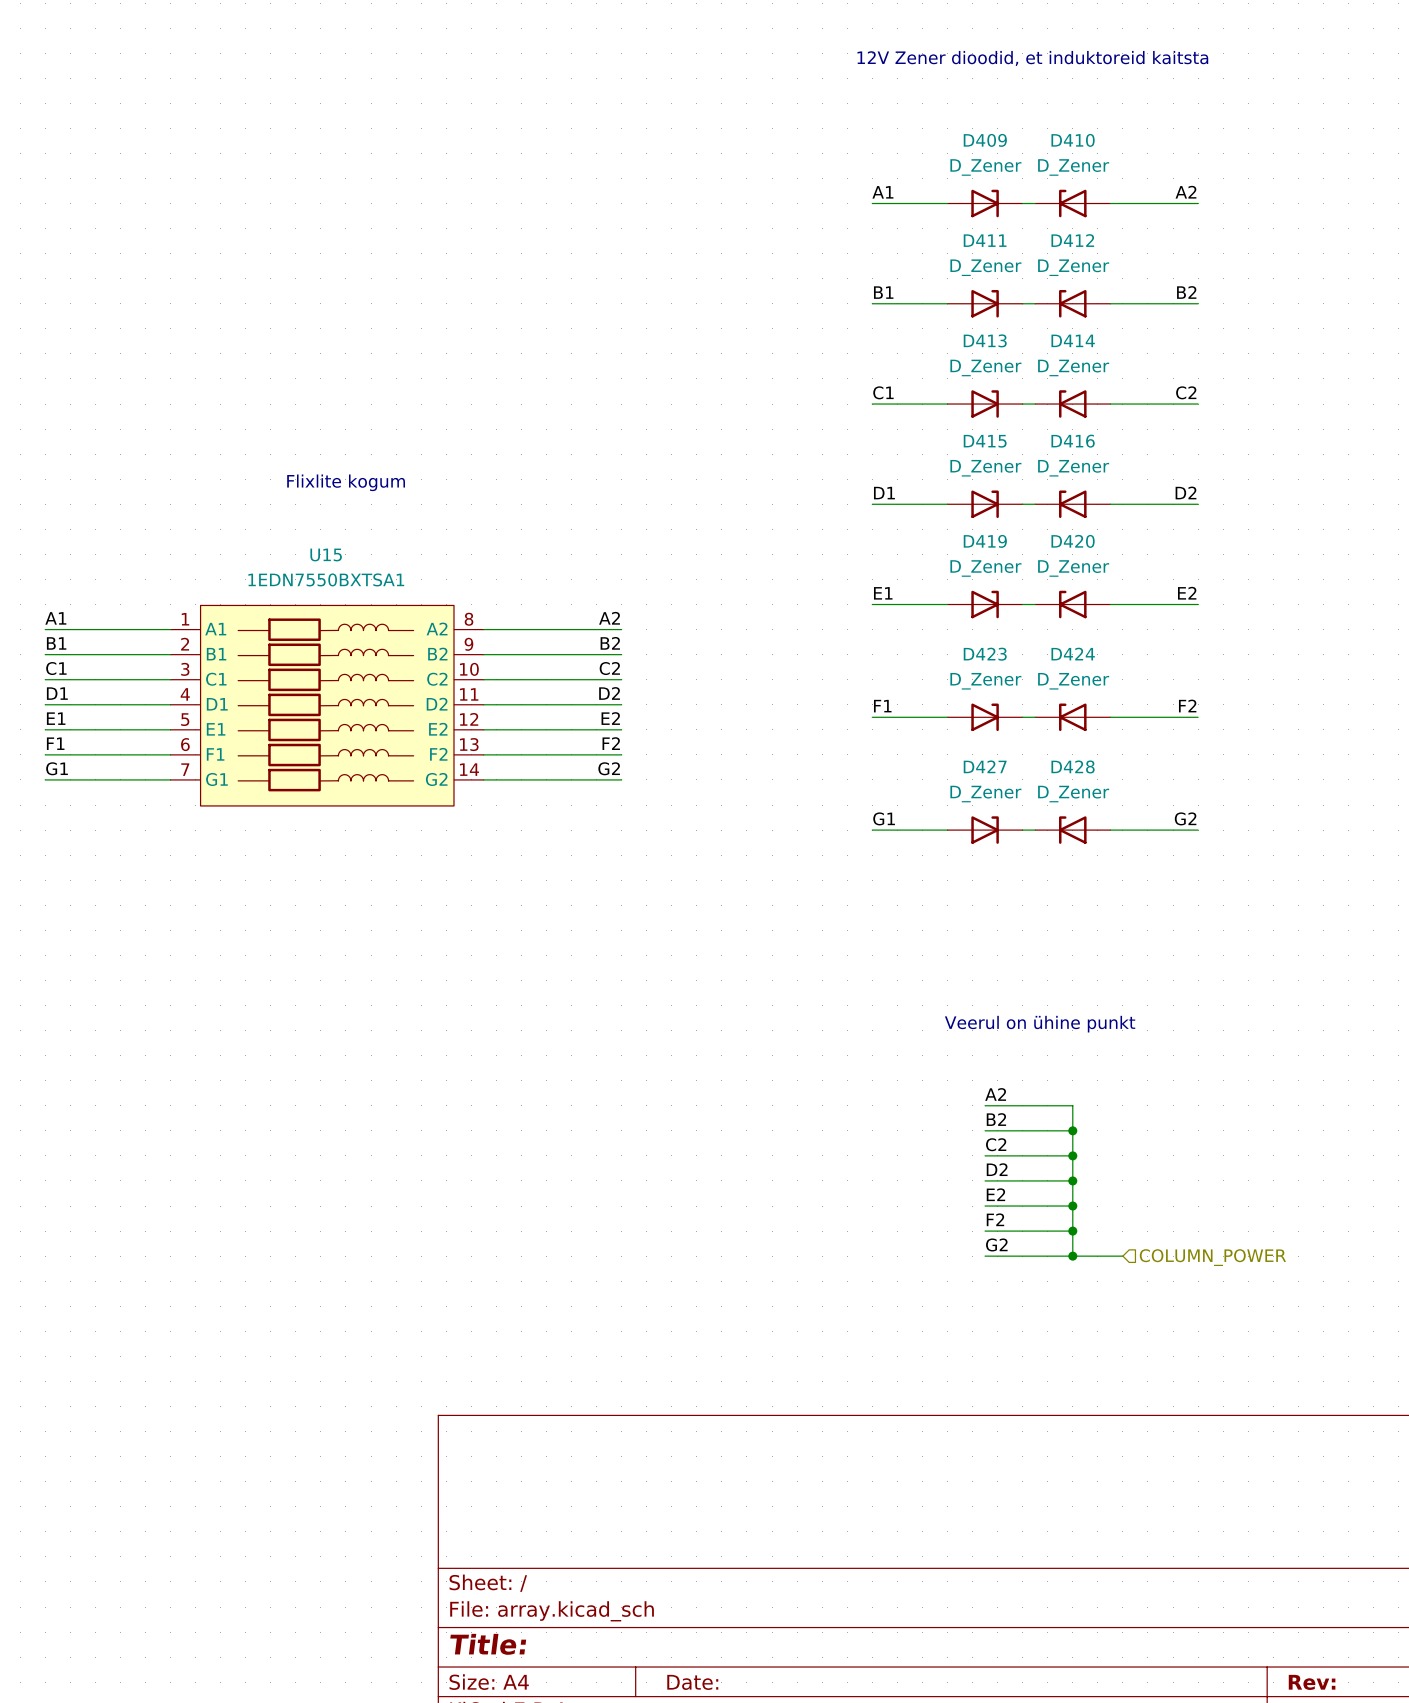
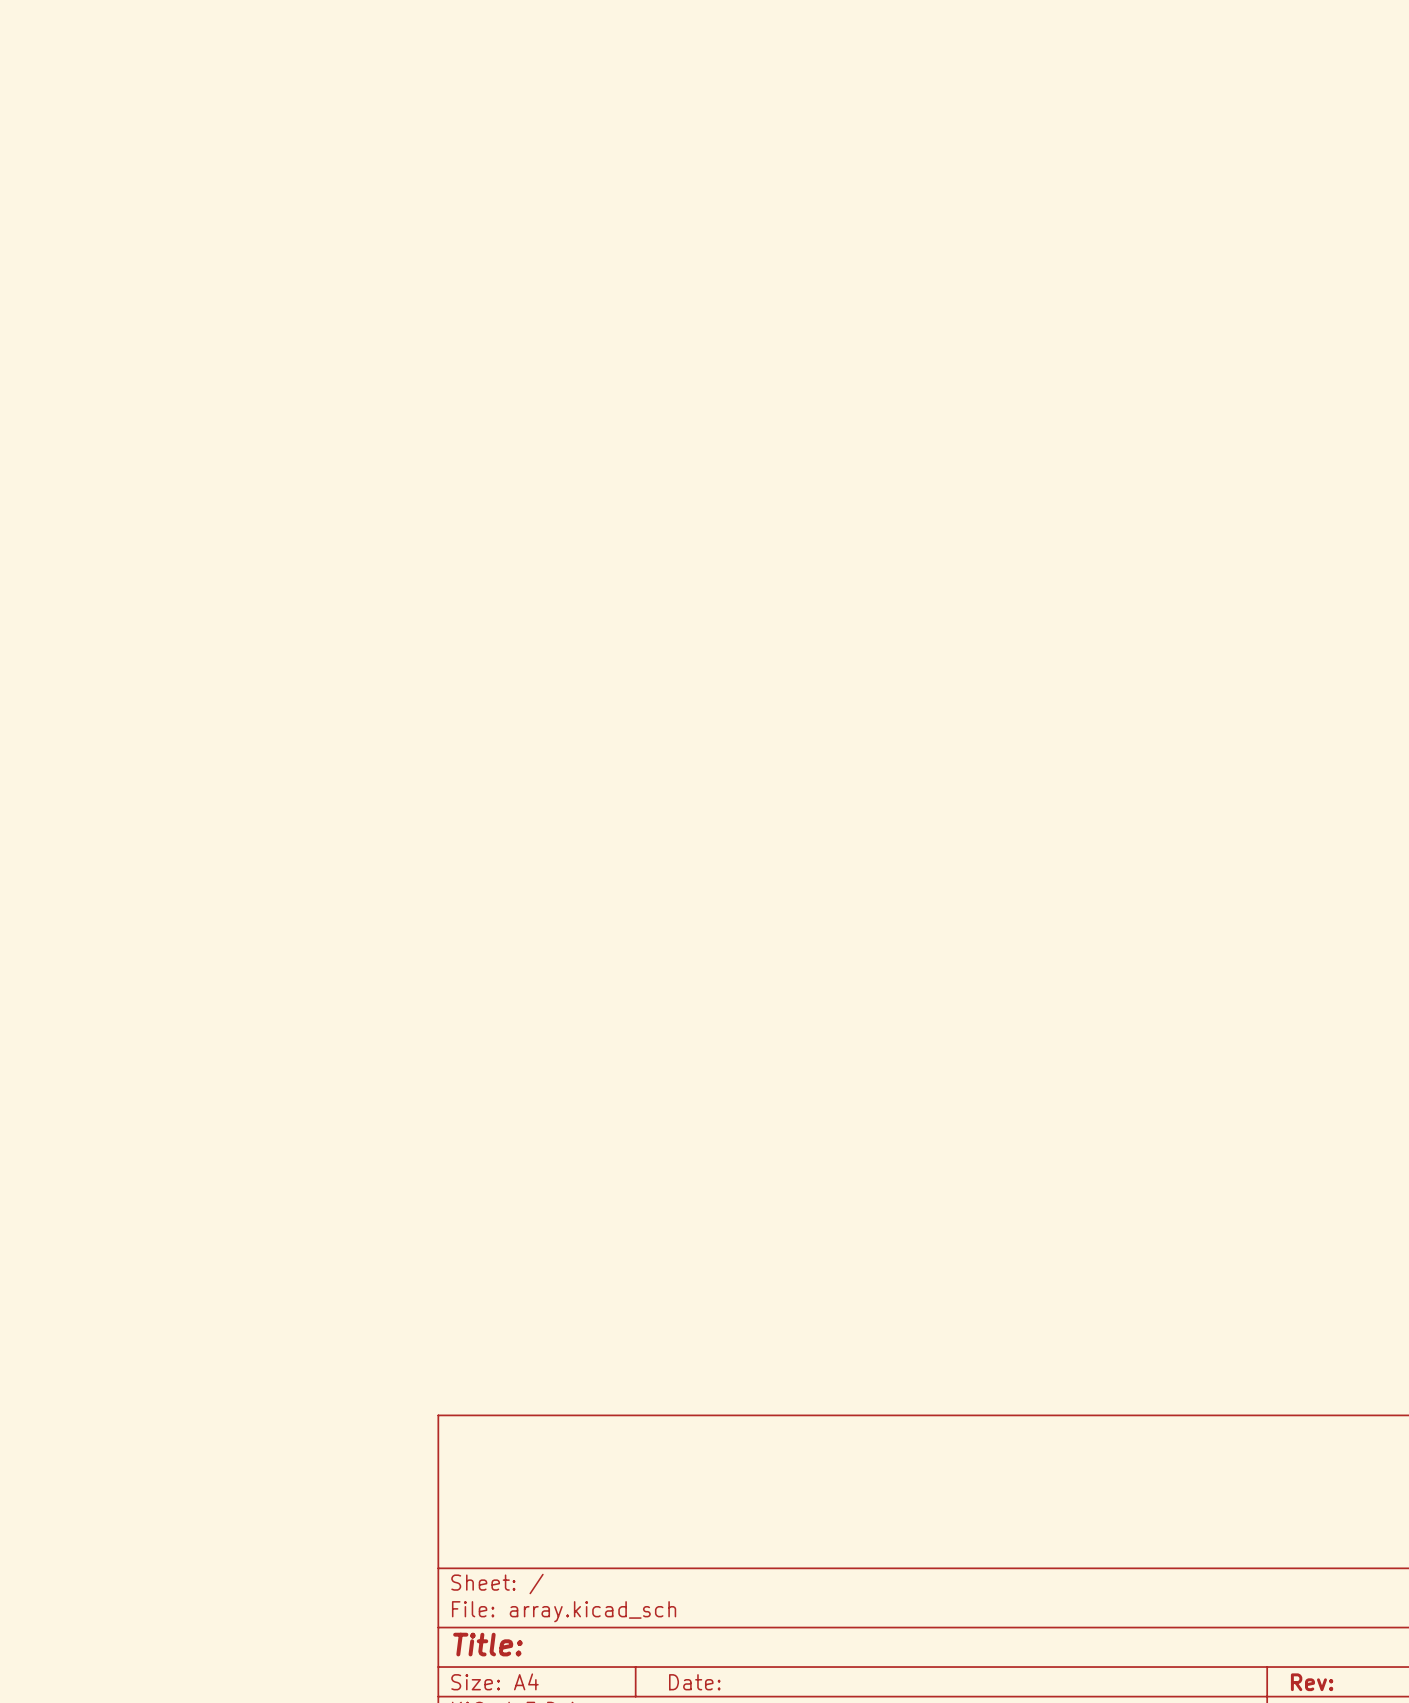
text: 12V Zener dioodid, et induktoreid kaitsta (1032, 58) -> none
label: A1 (882, 192) -> none
label: A2 (1185, 192) -> none
wire: (872, 203) (947, 203) -> none
D409: D_Zener (985, 203) -> none
wire: (1022, 203) (1035, 203) -> none
D410: D_Zener (1072, 203) -> none
wire: (1110, 203) (1198, 203) -> none
label: B1 (883, 292) -> none
label: B2 (1186, 292) -> none
wire: (872, 303) (947, 303) -> none
D411: D_Zener (985, 303) -> none
wire: (1022, 303) (1035, 303) -> none
D412: D_Zener (1072, 303) -> none
wire: (1110, 303) (1198, 303) -> none
label: C1 (883, 392) -> none
label: C2 (1186, 392) -> none
wire: (872, 404) (947, 404) -> none
D413: D_Zener (985, 404) -> none
wire: (1022, 404) (1035, 404) -> none
D414: D_Zener (1072, 404) -> none
wire: (1110, 404) (1198, 404) -> none
text: Flixlite kogum (346, 482) -> none
label: D2 (1186, 492) -> none
label: D1 (884, 493) -> none
wire: (872, 504) (947, 504) -> none
D415: D_Zener (985, 504) -> none
wire: (1022, 504) (1035, 504) -> none
D416: D_Zener (1072, 504) -> none
wire: (1110, 504) (1198, 504) -> none
label: E1 (883, 593) -> none
label: E2 (1187, 593) -> none
wire: (872, 604) (947, 604) -> none
D419: D_Zener (985, 604) -> none
wire: (1022, 604) (1035, 604) -> none
D420: D_Zener (1072, 604) -> none
wire: (1110, 604) (1198, 604) -> none
label: A1 (55, 618) -> none
label: A2 (609, 618) -> none
wire: (45, 629) (170, 629) -> none
wire: (483, 629) (621, 629) -> none
label: B1 (56, 643) -> none
label: B2 (610, 643) -> none
wire: (45, 654) (170, 654) -> none
wire: (483, 654) (621, 654) -> none
label: C1 (56, 668) -> none
label: C2 (609, 668) -> none
wire: (45, 679) (170, 679) -> none
wire: (483, 679) (621, 679) -> none
label: D1 (57, 693) -> none
label: D2 (609, 693) -> none
wire: (45, 704) (170, 704) -> none
wire: (483, 704) (621, 704) -> none
U15: 1EDN7550BXTSA1 (327, 705) -> none
label: F1 (882, 706) -> none
label: F2 (1187, 706) -> none
wire: (872, 717) (947, 717) -> none
D423: D_Zener (985, 717) -> none
wire: (1022, 717) (1035, 717) -> none
D424: D_Zener (1072, 717) -> none
wire: (1110, 717) (1198, 717) -> none
label: E1 (56, 718) -> none
label: E2 (610, 718) -> none
wire: (45, 729) (170, 729) -> none
wire: (483, 729) (621, 729) -> none
label: F1 (55, 743) -> none
label: F2 (611, 743) -> none
wire: (45, 754) (170, 754) -> none
wire: (483, 754) (621, 754) -> none
label: G1 (57, 768) -> none
label: G2 (609, 768) -> none
wire: (45, 779) (170, 779) -> none
wire: (483, 779) (621, 779) -> none
label: G1 (884, 818) -> none
label: G2 (1185, 818) -> none
wire: (872, 830) (947, 830) -> none
D427: D_Zener (985, 830) -> none
wire: (1022, 830) (1035, 830) -> none
D428: D_Zener (1072, 830) -> none
wire: (1110, 830) (1198, 830) -> none
text: Veerul on ühine punkt (1040, 1024) -> none
label: A2 (995, 1094) -> none
wire: (985, 1105) (1072, 1105) (1072, 1256) -> none
label: B2 (996, 1119) -> none
wire: (985, 1130) (1072, 1130) -> none
junction: (1072, 1130) -> none
label: C2 (996, 1144) -> none
wire: (985, 1155) (1072, 1155) -> none
junction: (1072, 1155) -> none
label: D2 (997, 1169) -> none
wire: (985, 1180) (1072, 1180) -> none
junction: (1072, 1180) -> none
label: E2 (995, 1194) -> none
wire: (985, 1206) (1072, 1206) -> none
junction: (1072, 1206) -> none
label: F2 (995, 1219) -> none
wire: (985, 1231) (1072, 1231) -> none
junction: (1072, 1231) -> none
label: G2 (996, 1244) -> none
wire: (985, 1256) (1122, 1256) -> none
junction: (1072, 1256) -> none
hierarchical label: COLUMN_POWER (1212, 1257) -> none

